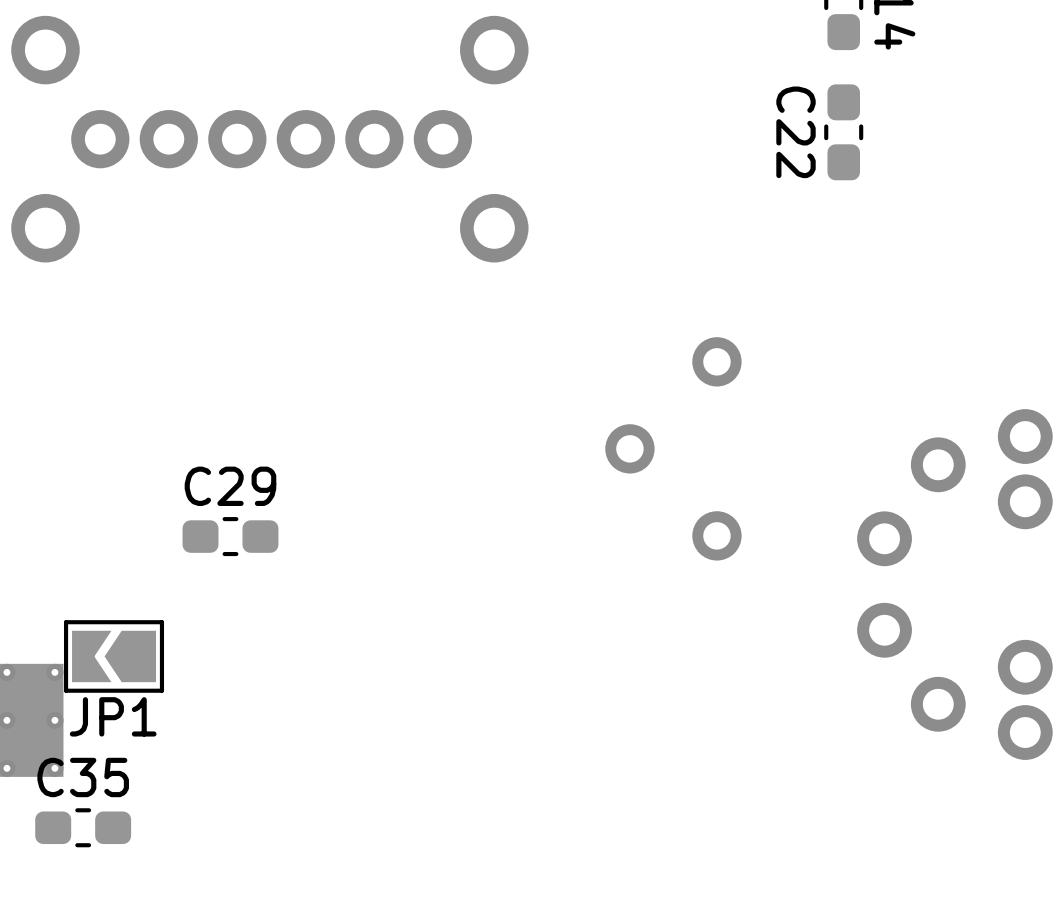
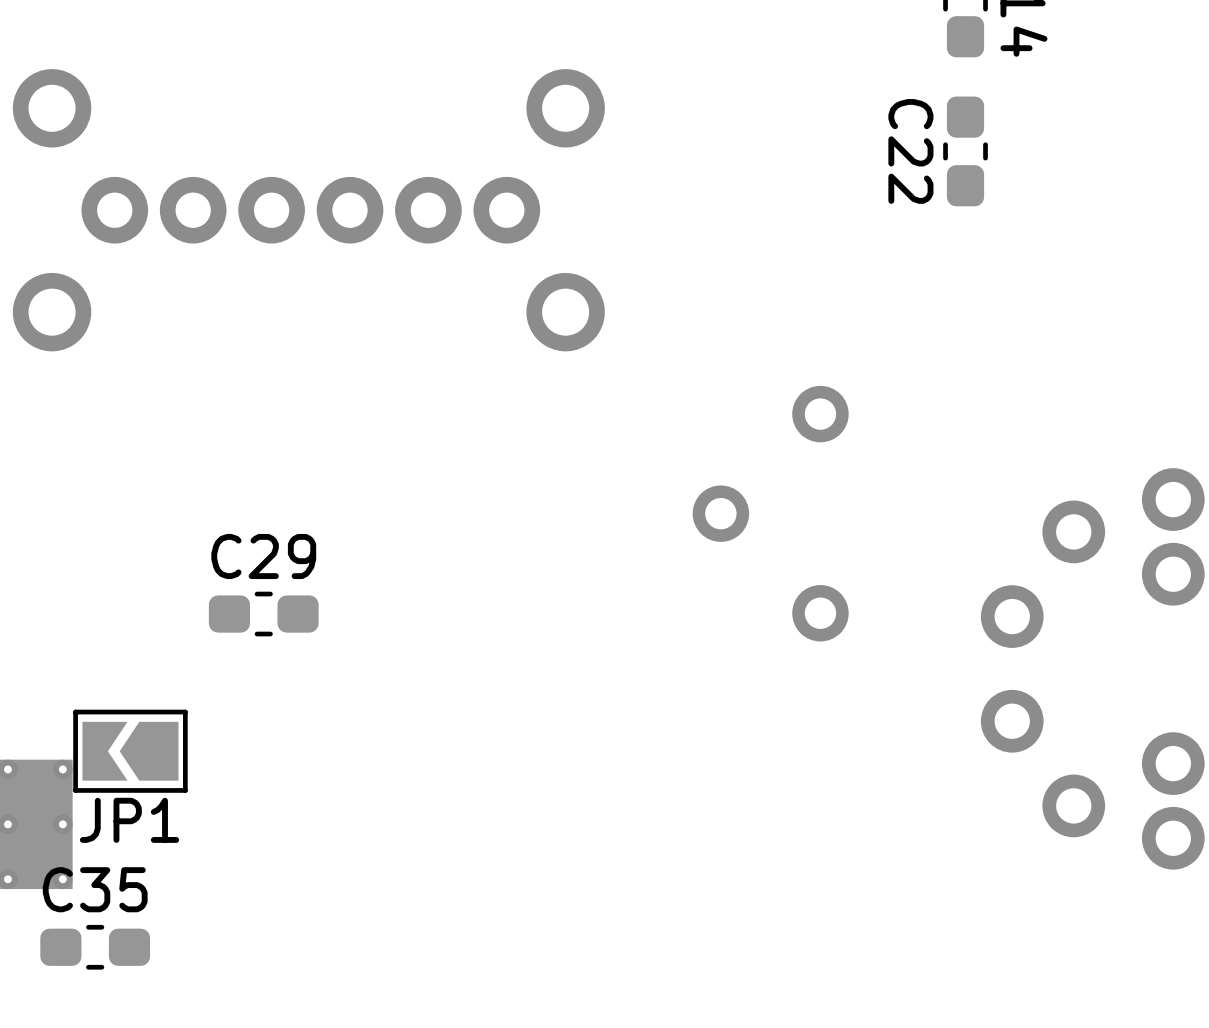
part position: (269, 139) -> (308, 210)

